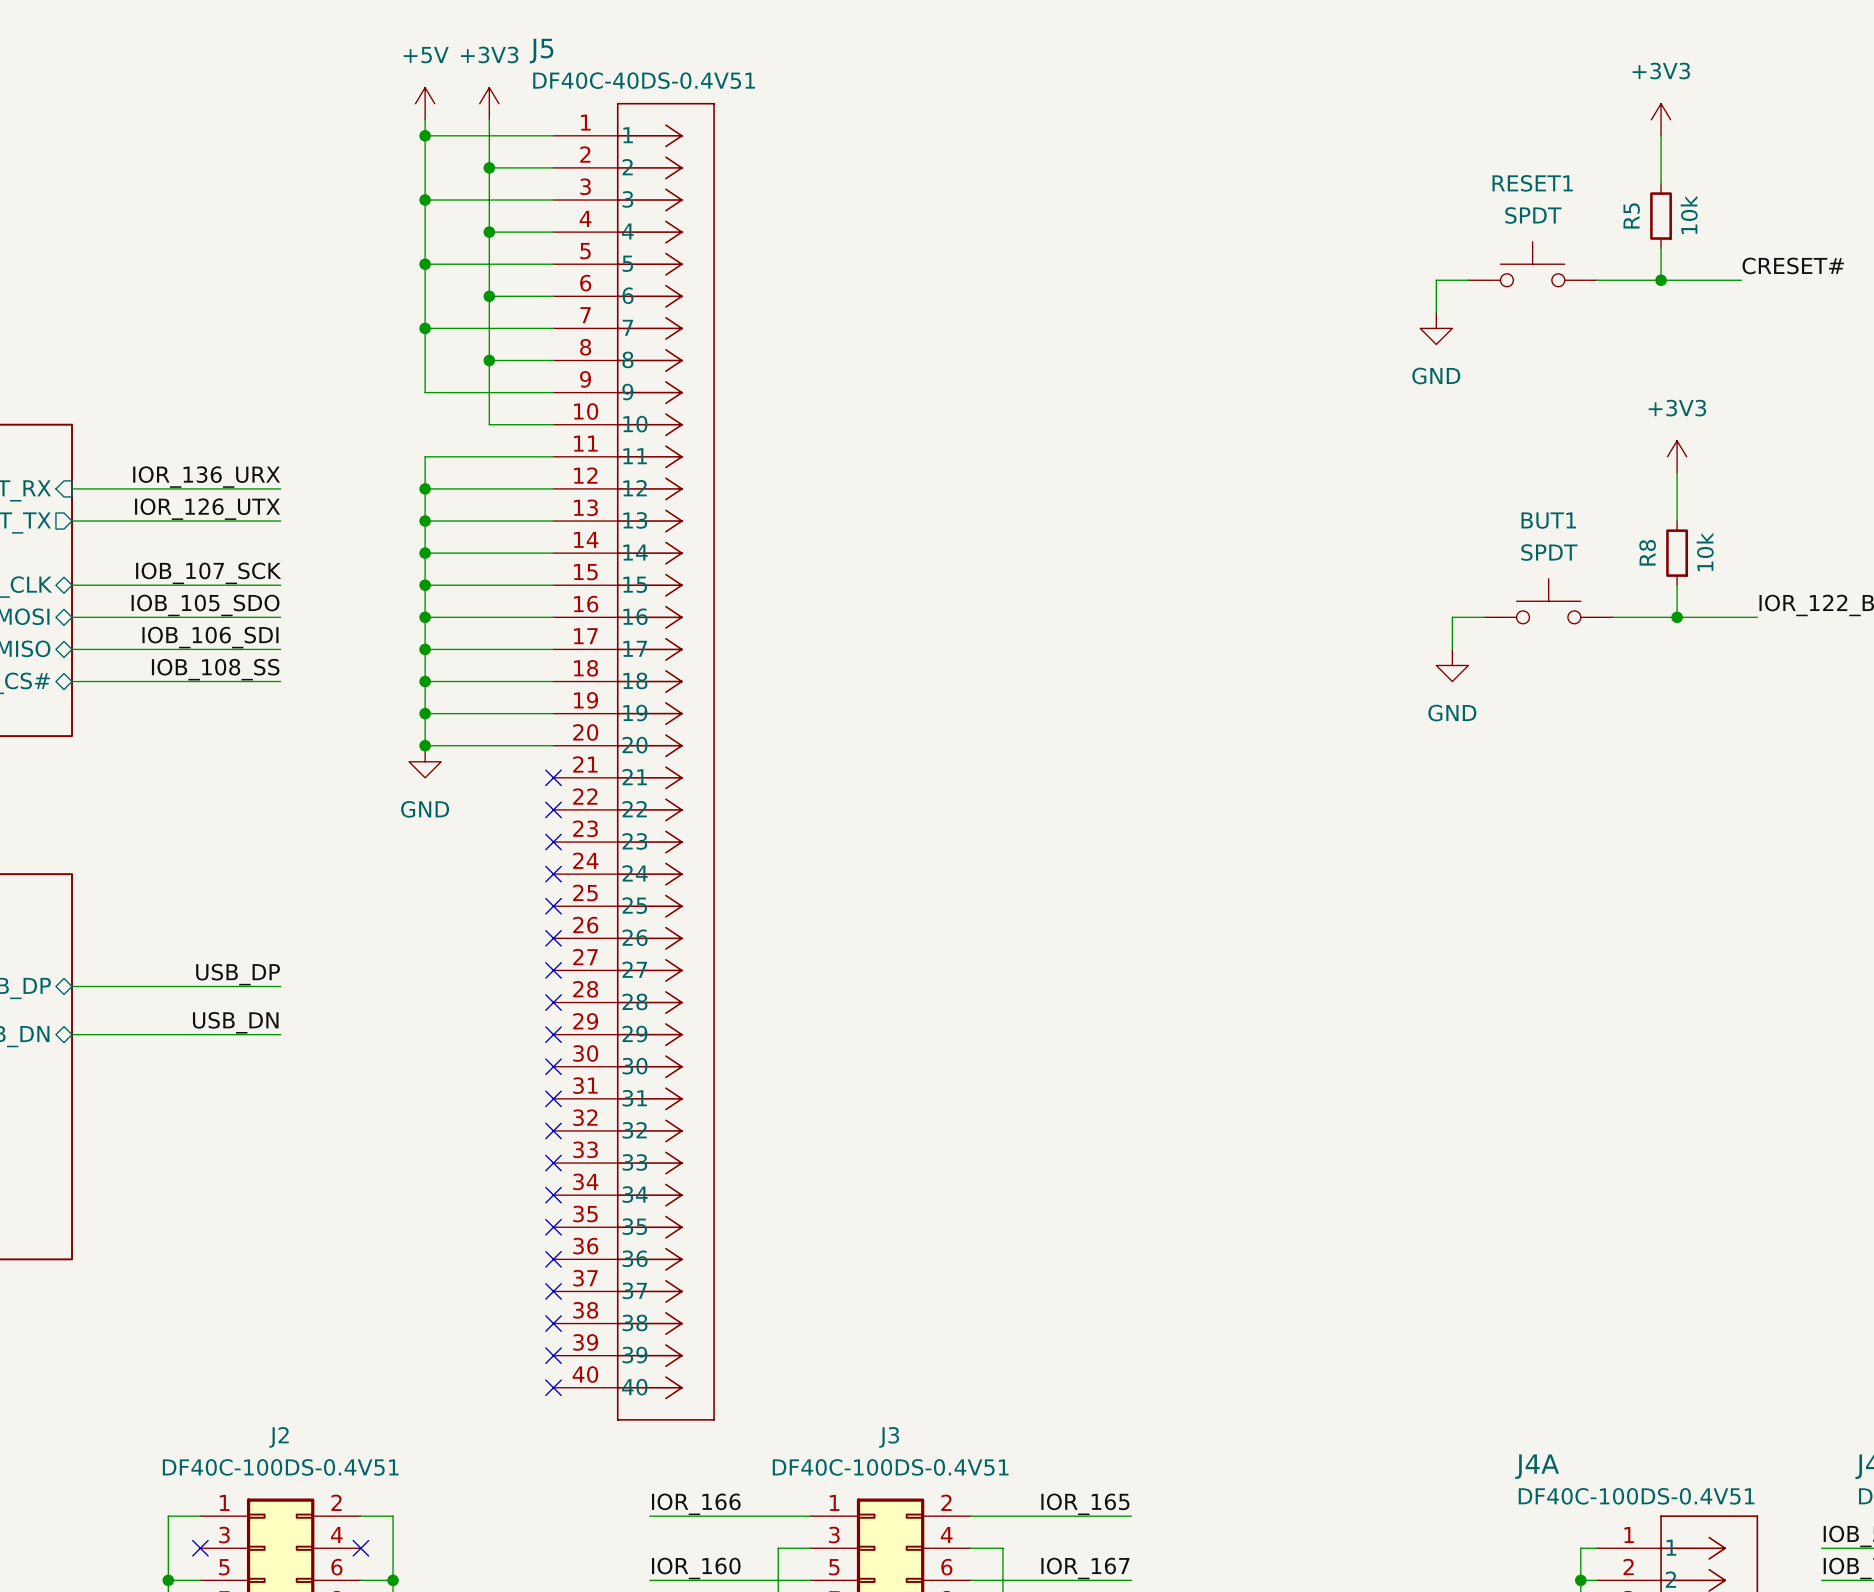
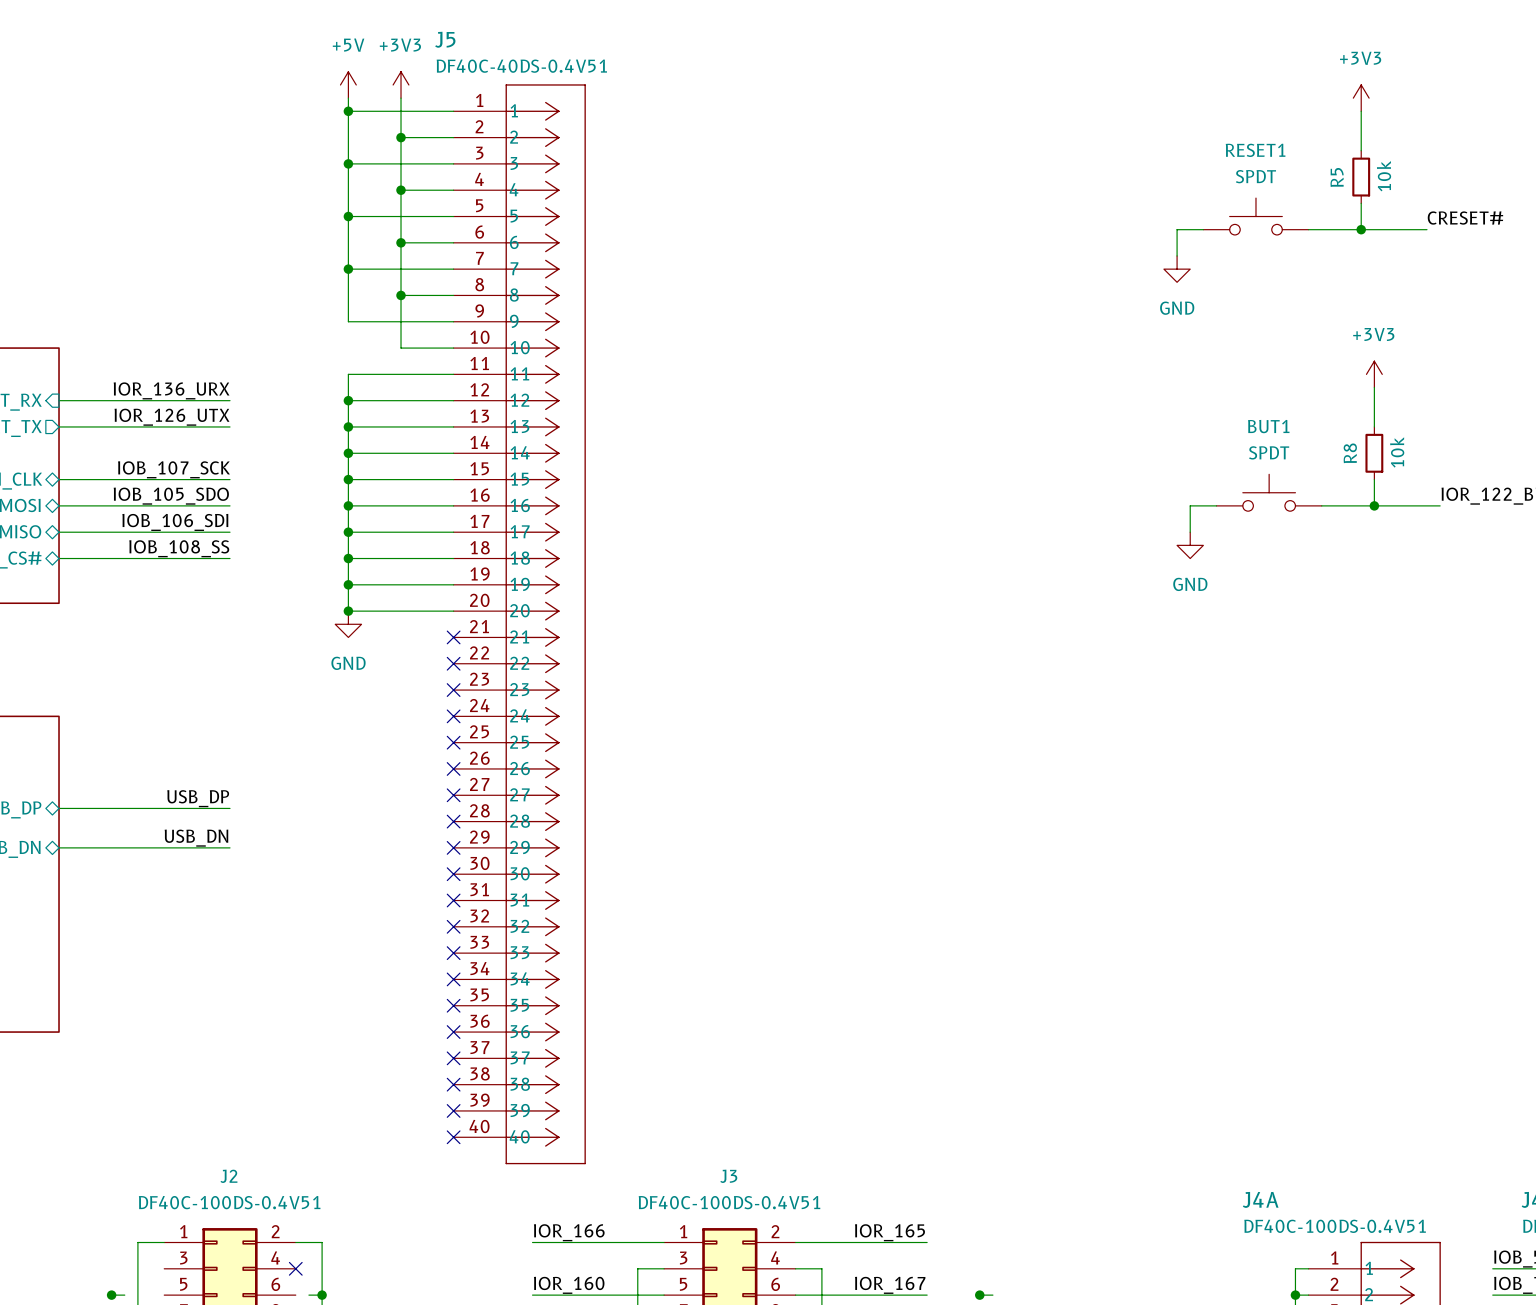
no-connect mark: (200, 1548) -> none
wire: (168, 1580) (200, 1580) -> none
junction position: (168, 1580) -> (111, 1295)
wire: (360, 1580) (376, 1580) -> (111, 1295) (124, 1295)
wire: none -> (979, 1295) (992, 1295)
junction: none -> (979, 1295)

